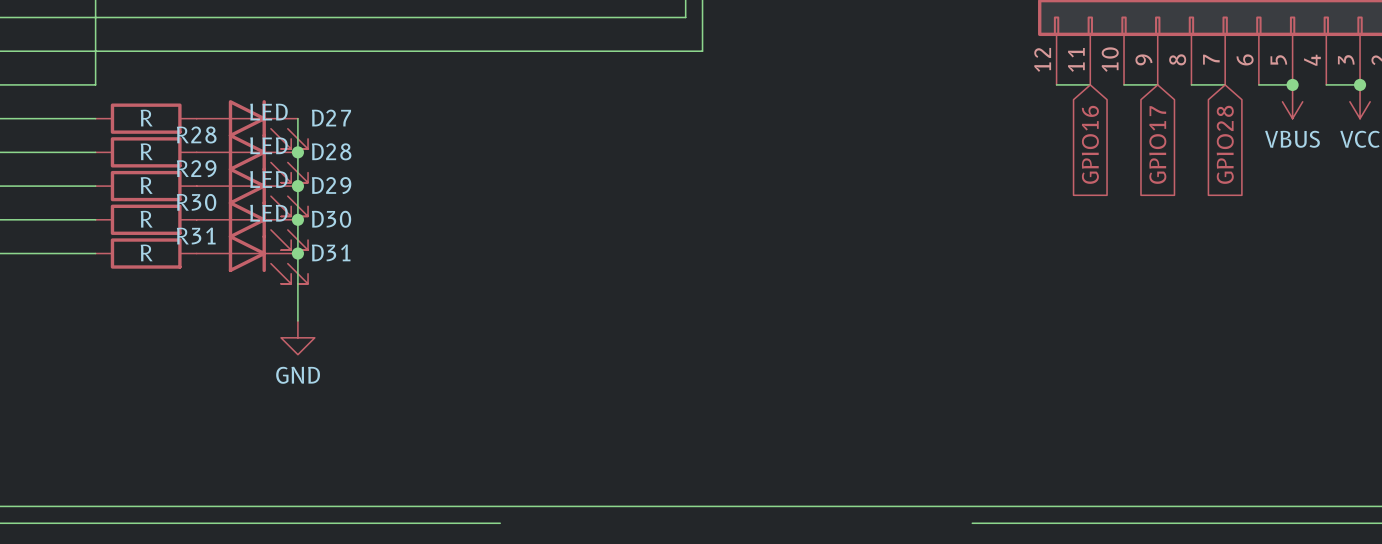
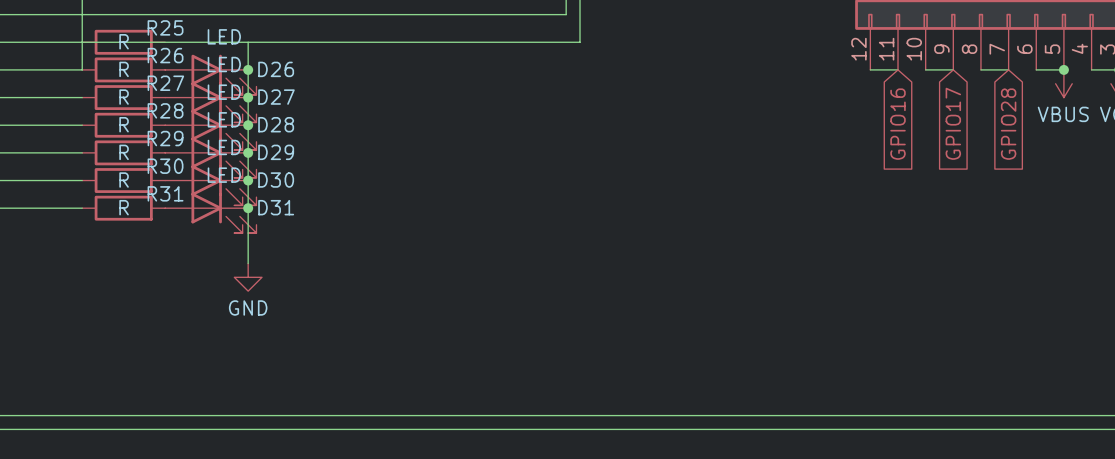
R25: none -> R (123, 42)
wire: none -> (248, 42) (248, 97)
D27 value: none -> LED (224, 64)
R26: none -> R (123, 69)
junction: none -> (248, 69)
D26: none -> LED (210, 74)
R27 name: none -> R27 (165, 83)
junction: none -> (248, 97)
wire: none -> (414, 429) (801, 429)

